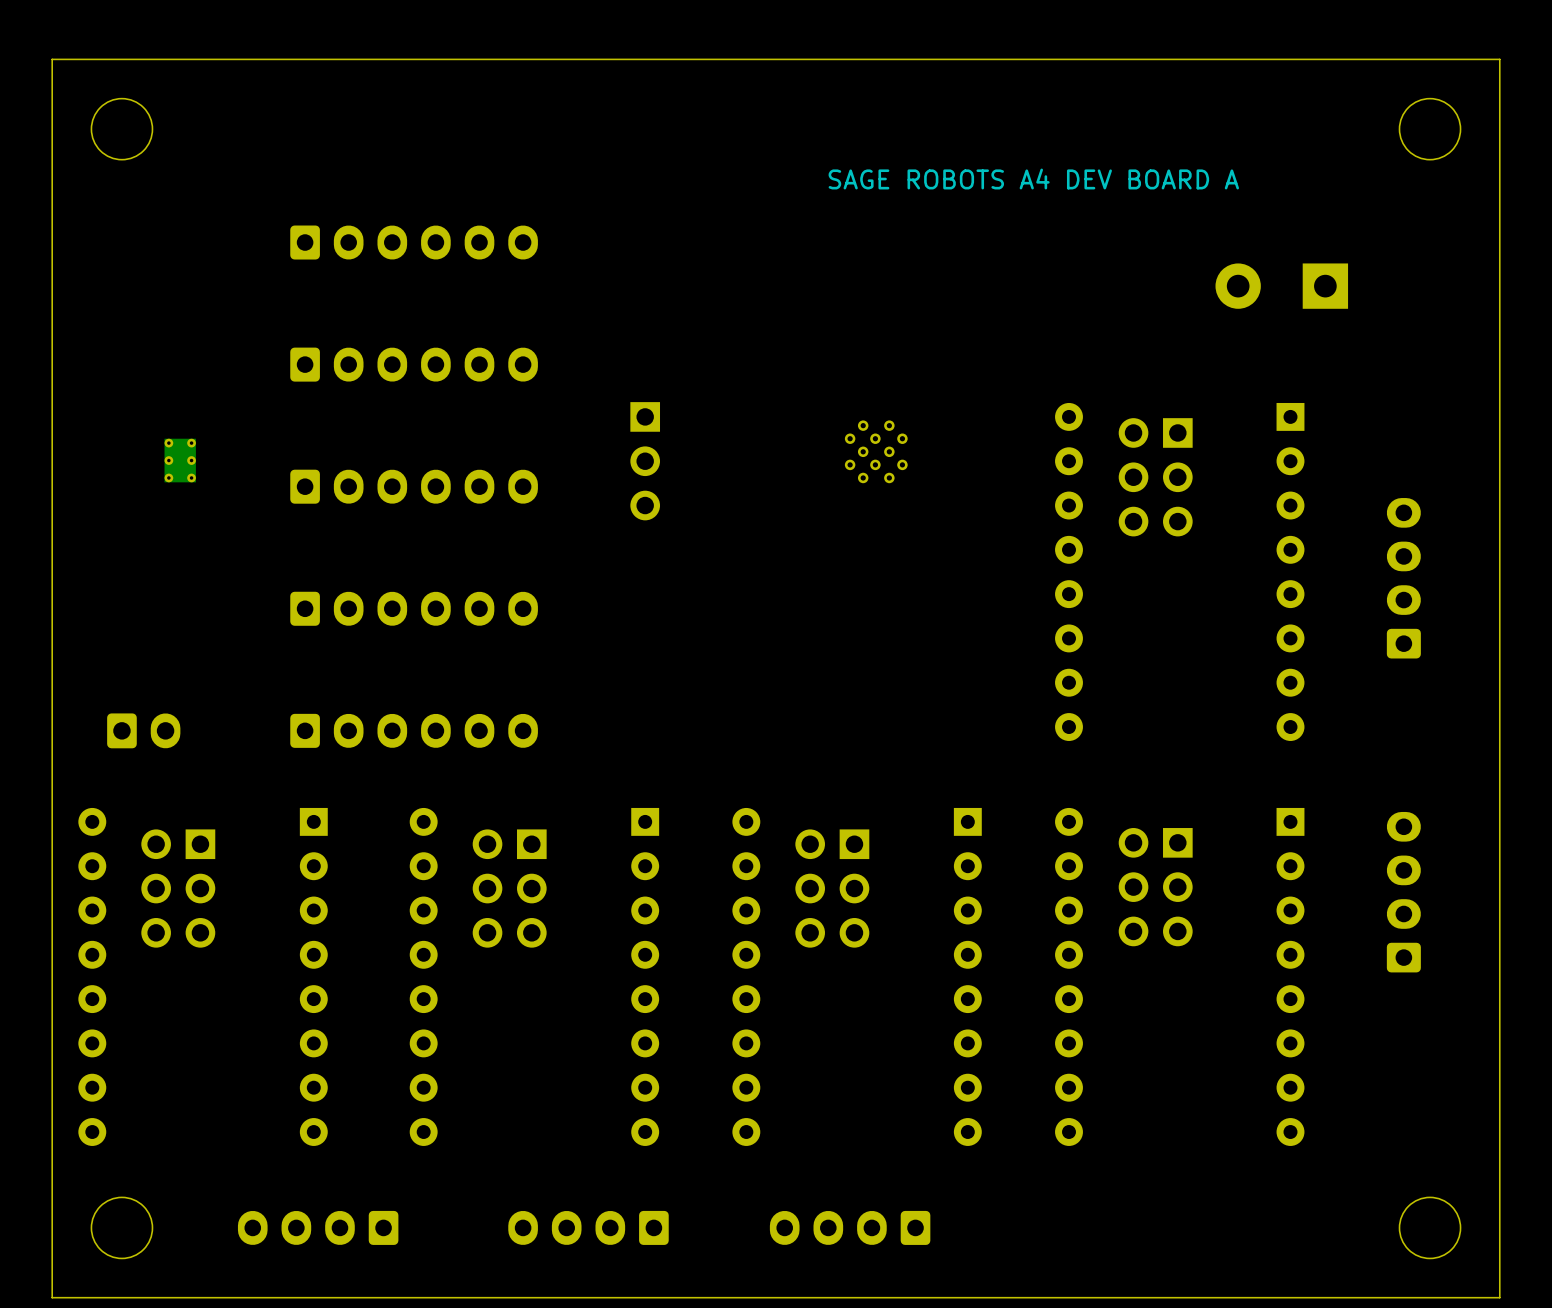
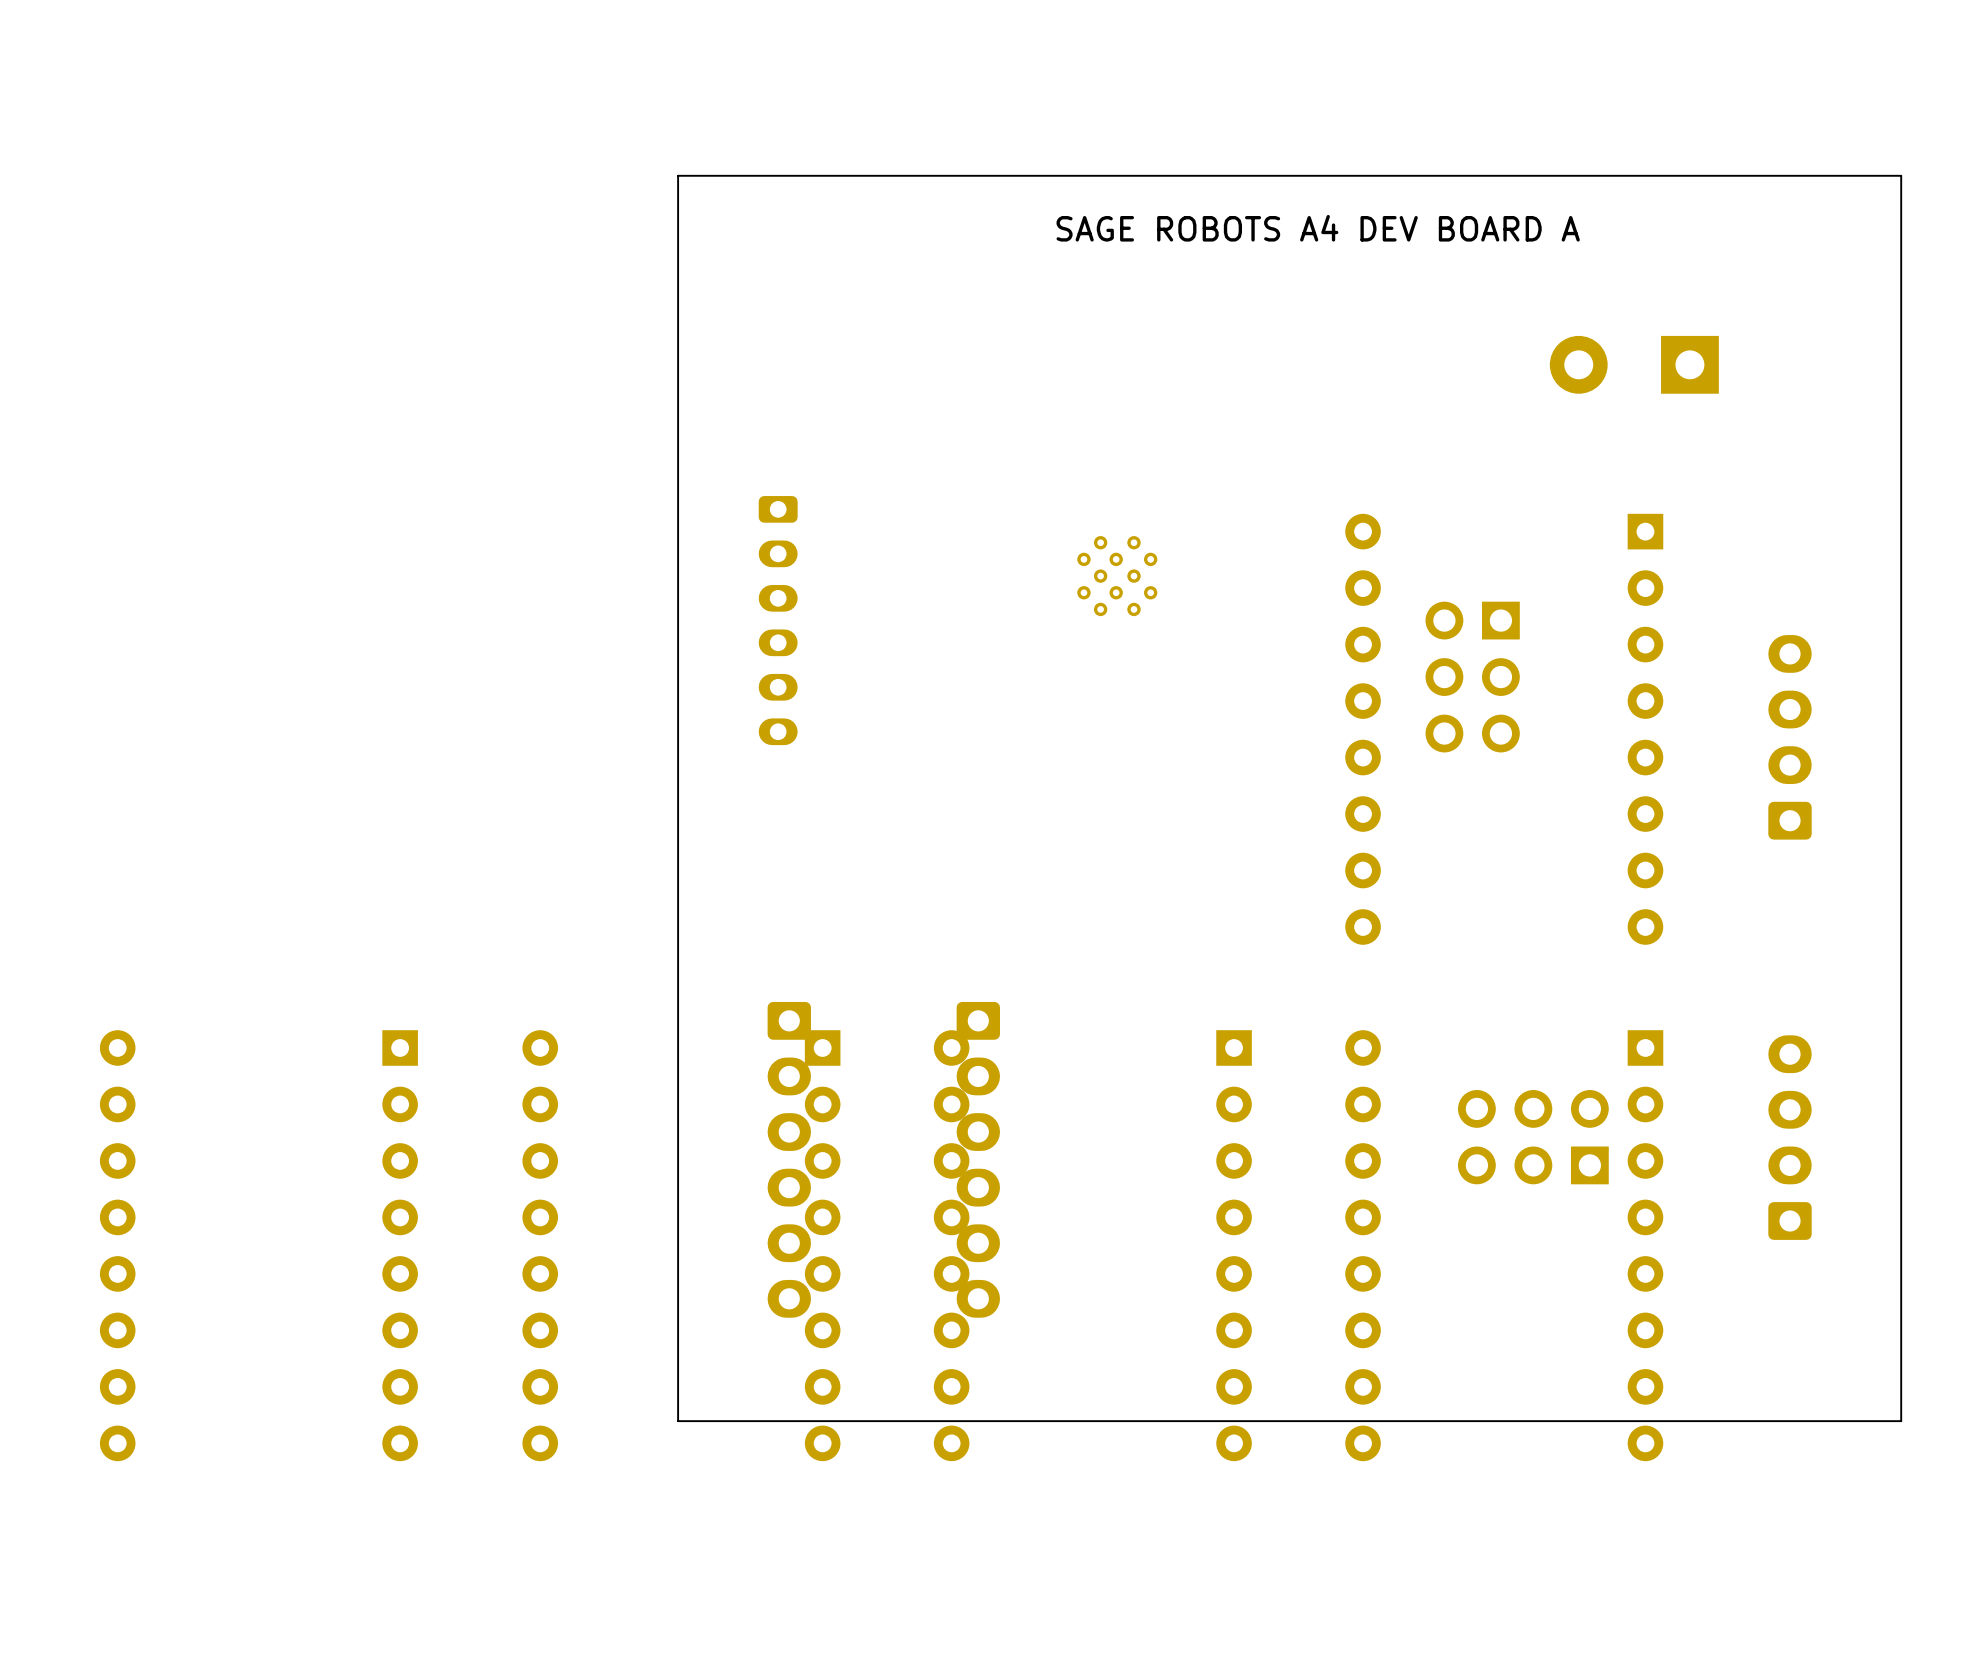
board edge: (1499, 59) (1499, 1297) (52, 1297) (52, 59) (1499, 59) -> (1901, 175) (1901, 1421) (678, 1421) (678, 175) (1901, 175)
round board edge: [91, 98, 153, 161] -> none
round board edge: [1399, 98, 1461, 161] -> none
part: (414, 242) -> none
part: (414, 364) -> none
part: (180, 460) -> none
part: (645, 461) -> none
part position: (1155, 477) -> (1472, 677)
part: (414, 486) -> none
part: none -> (778, 620)
part: (414, 608) -> none
part: (143, 730) -> none
part: (414, 730) -> none
part rotation: 0° (1155, 887) -> 90° clockwise (1533, 1137)
part: (178, 888) -> none
part: (509, 888) -> none
part: (832, 888) -> none
part: none -> (789, 1159)
part: none -> (978, 1159)
round board edge: [91, 1196, 153, 1259] -> none
round board edge: [1399, 1196, 1461, 1259] -> none
part: (318, 1227) -> none
part: (588, 1227) -> none
part: (850, 1227) -> none

